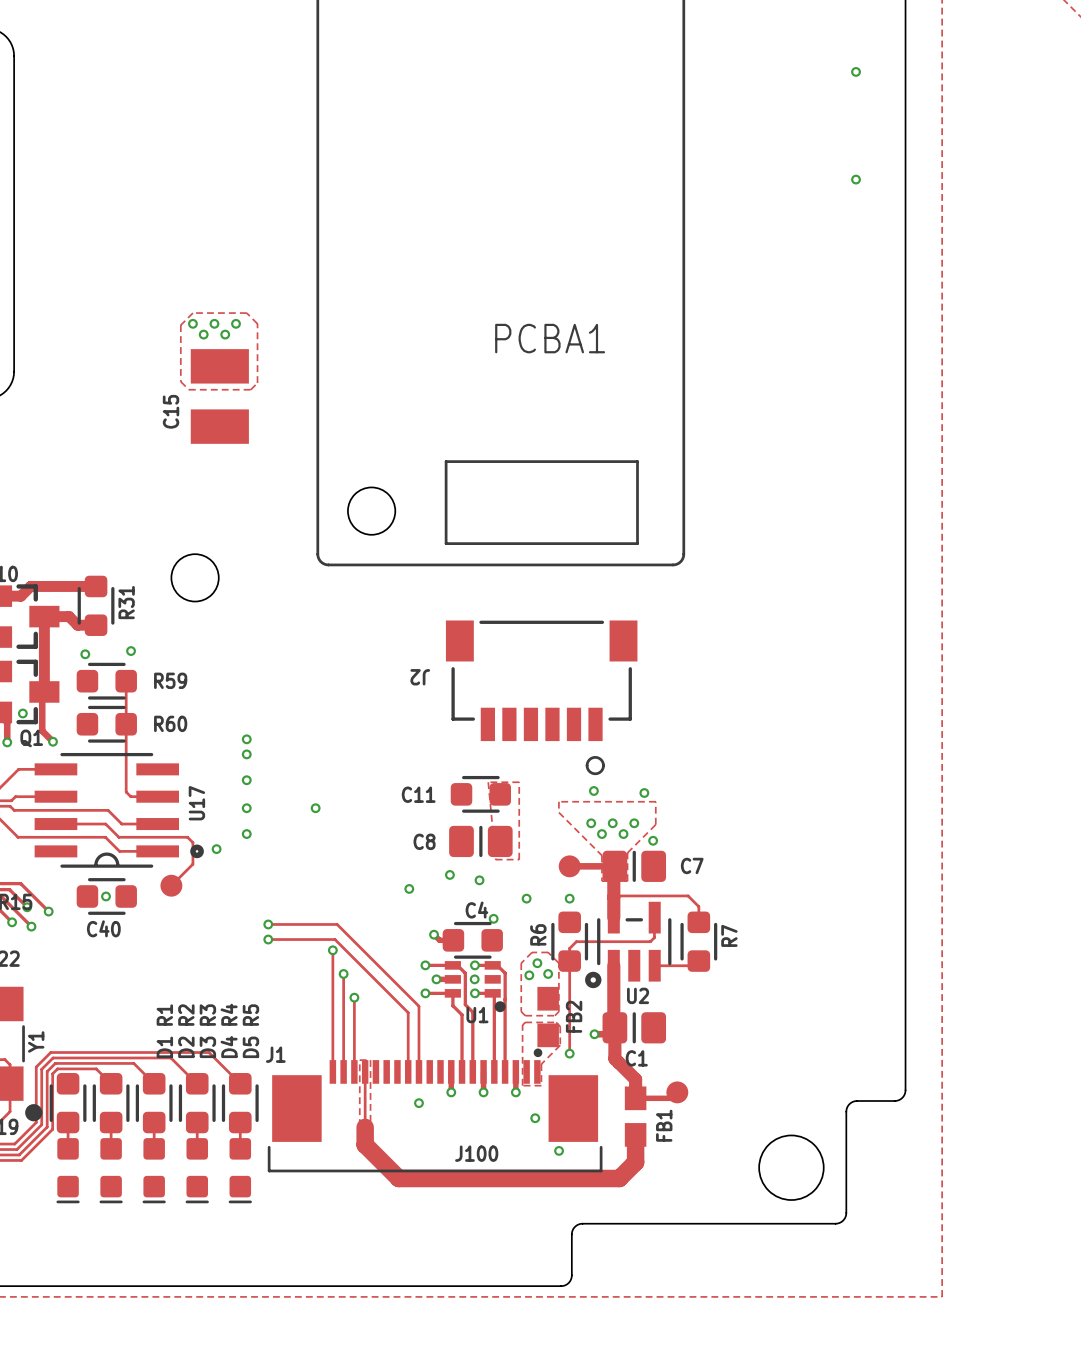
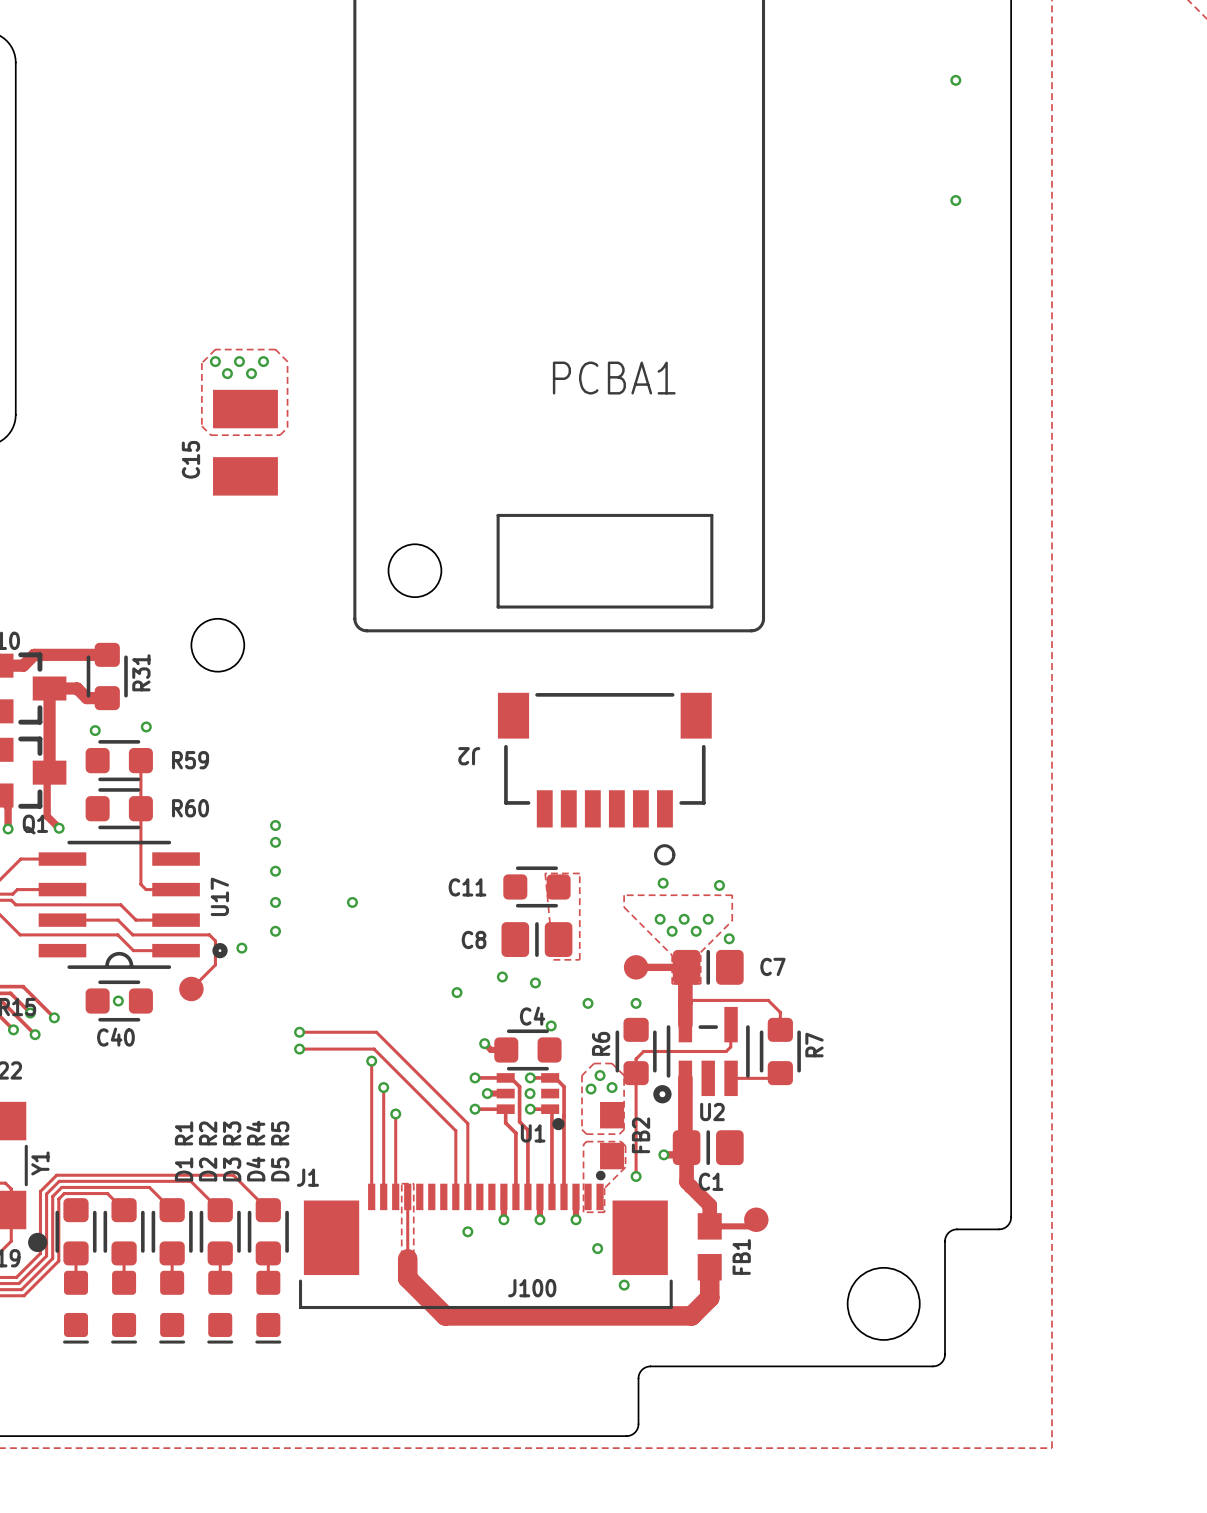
via: (22, 713) -> none

